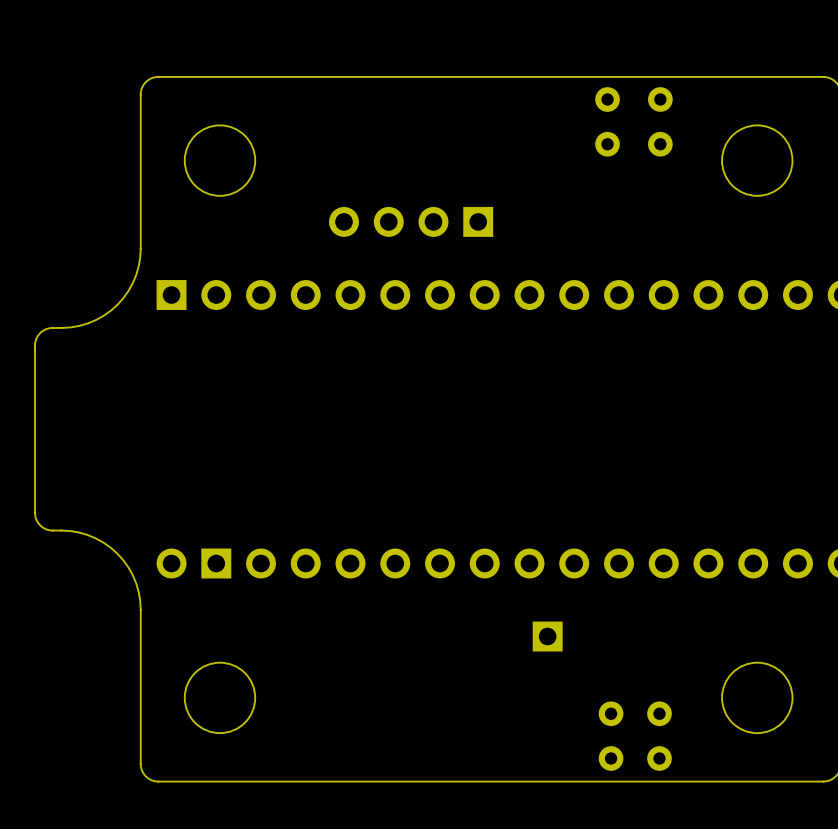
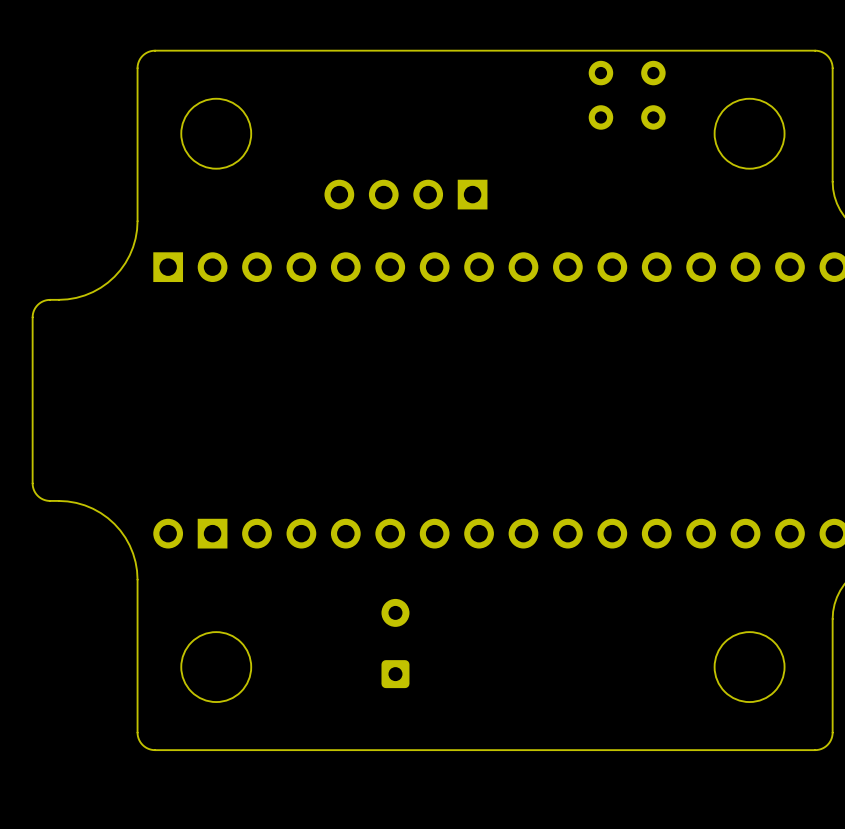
part: (547, 636) -> none
part: none -> (395, 643)
part: (611, 736) -> none
part: (659, 736) -> none

